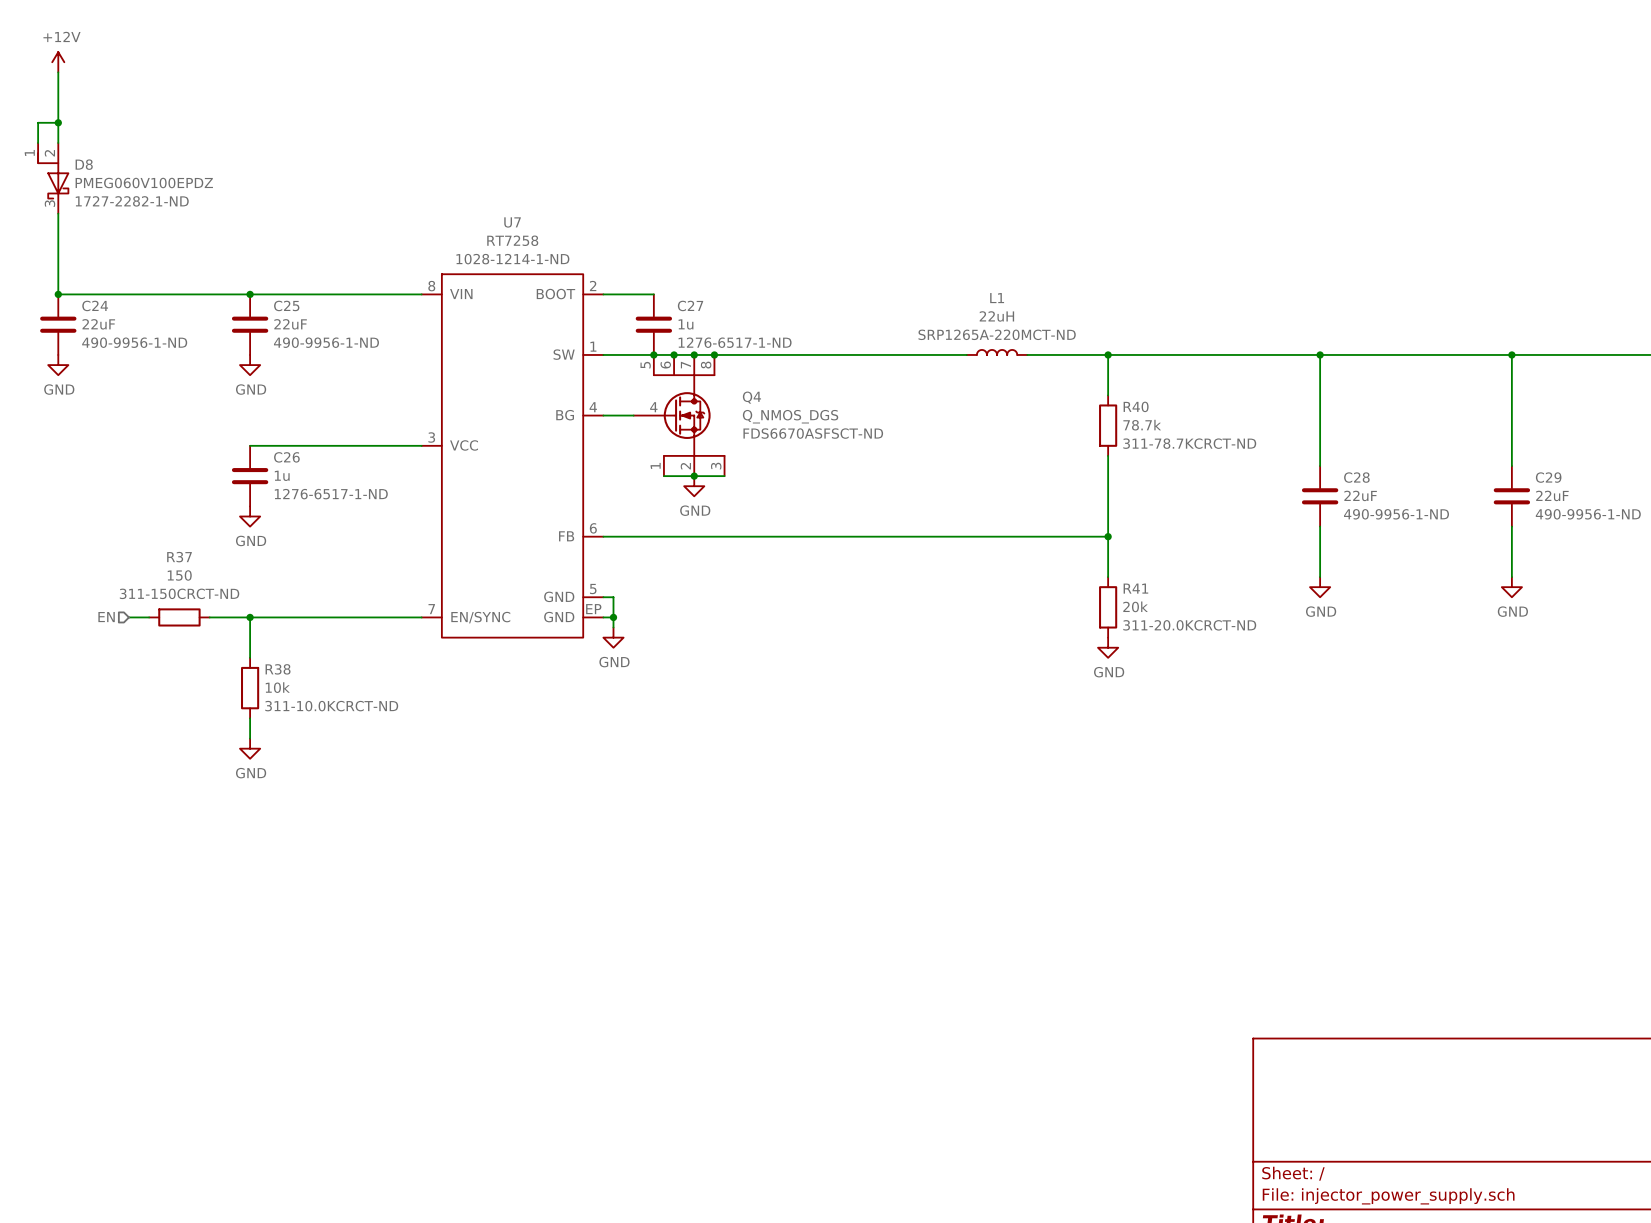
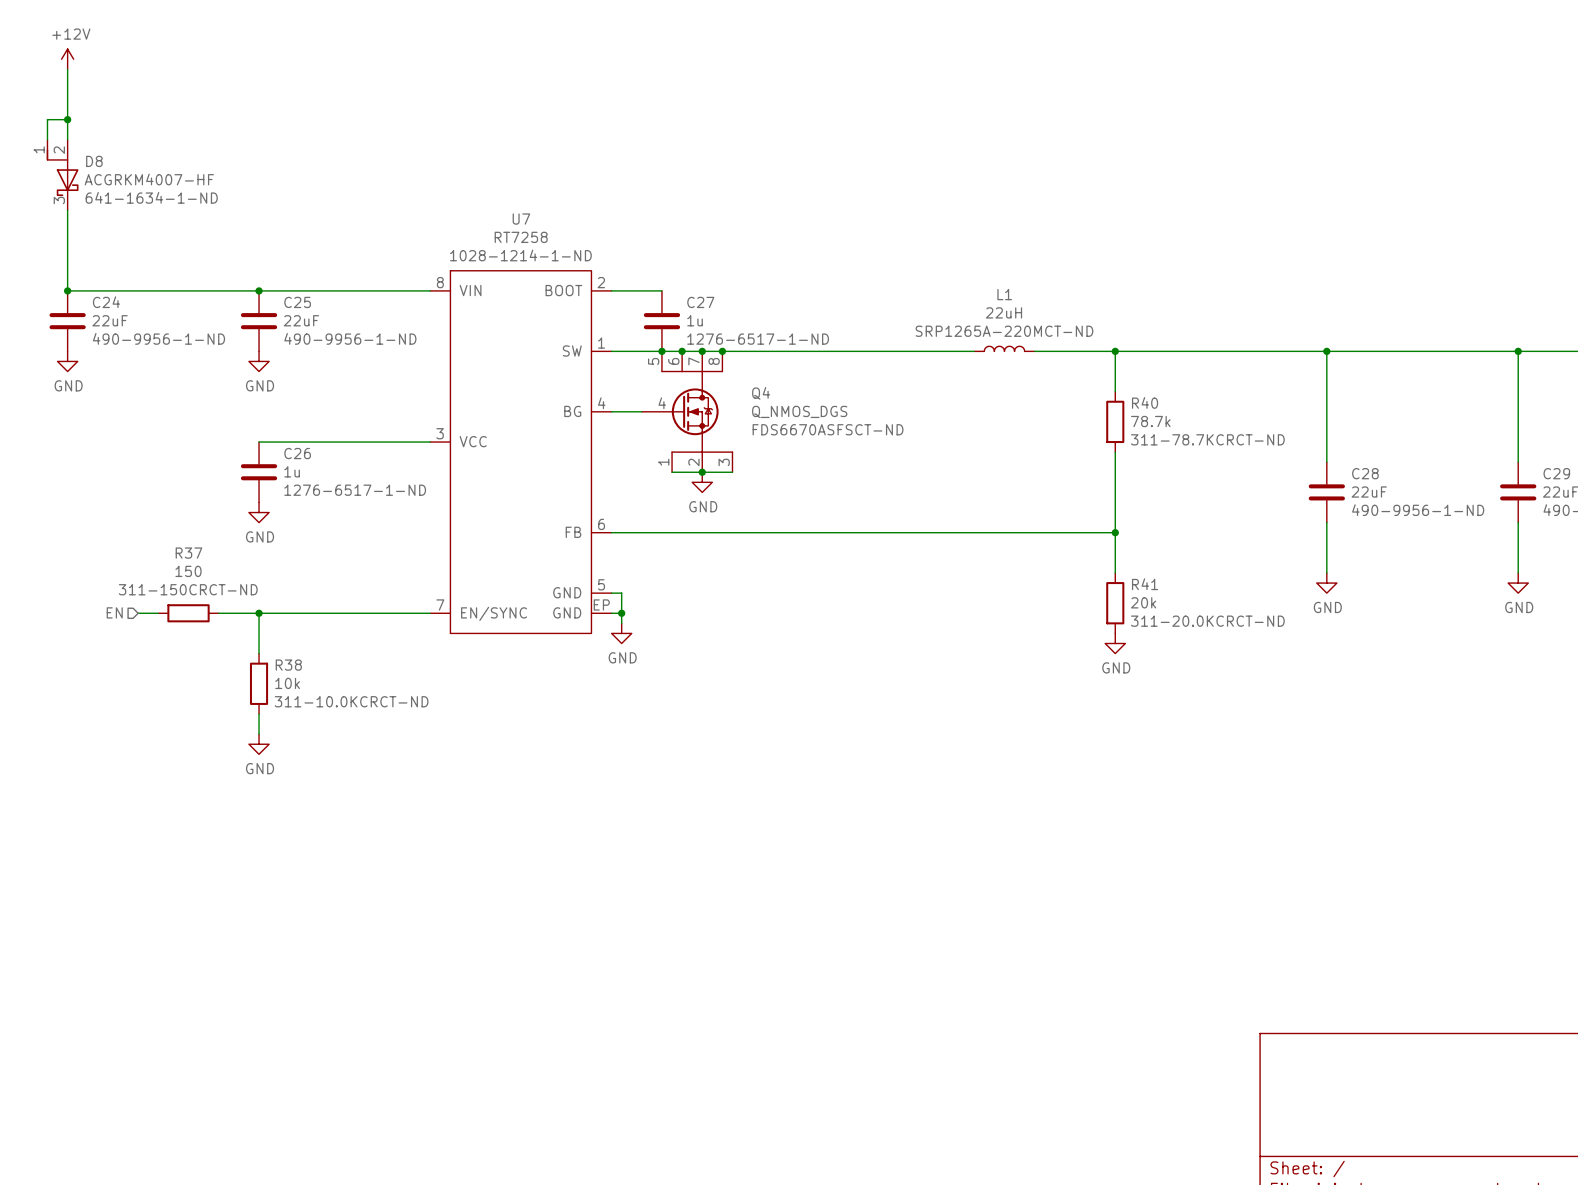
D8 value: PMEG060V100EPDZ (144, 183) -> ACGRKM4007-HF (149, 179)
D8 text: 1727-2282-1-ND (132, 201) -> 641-1634-1-ND (151, 197)

